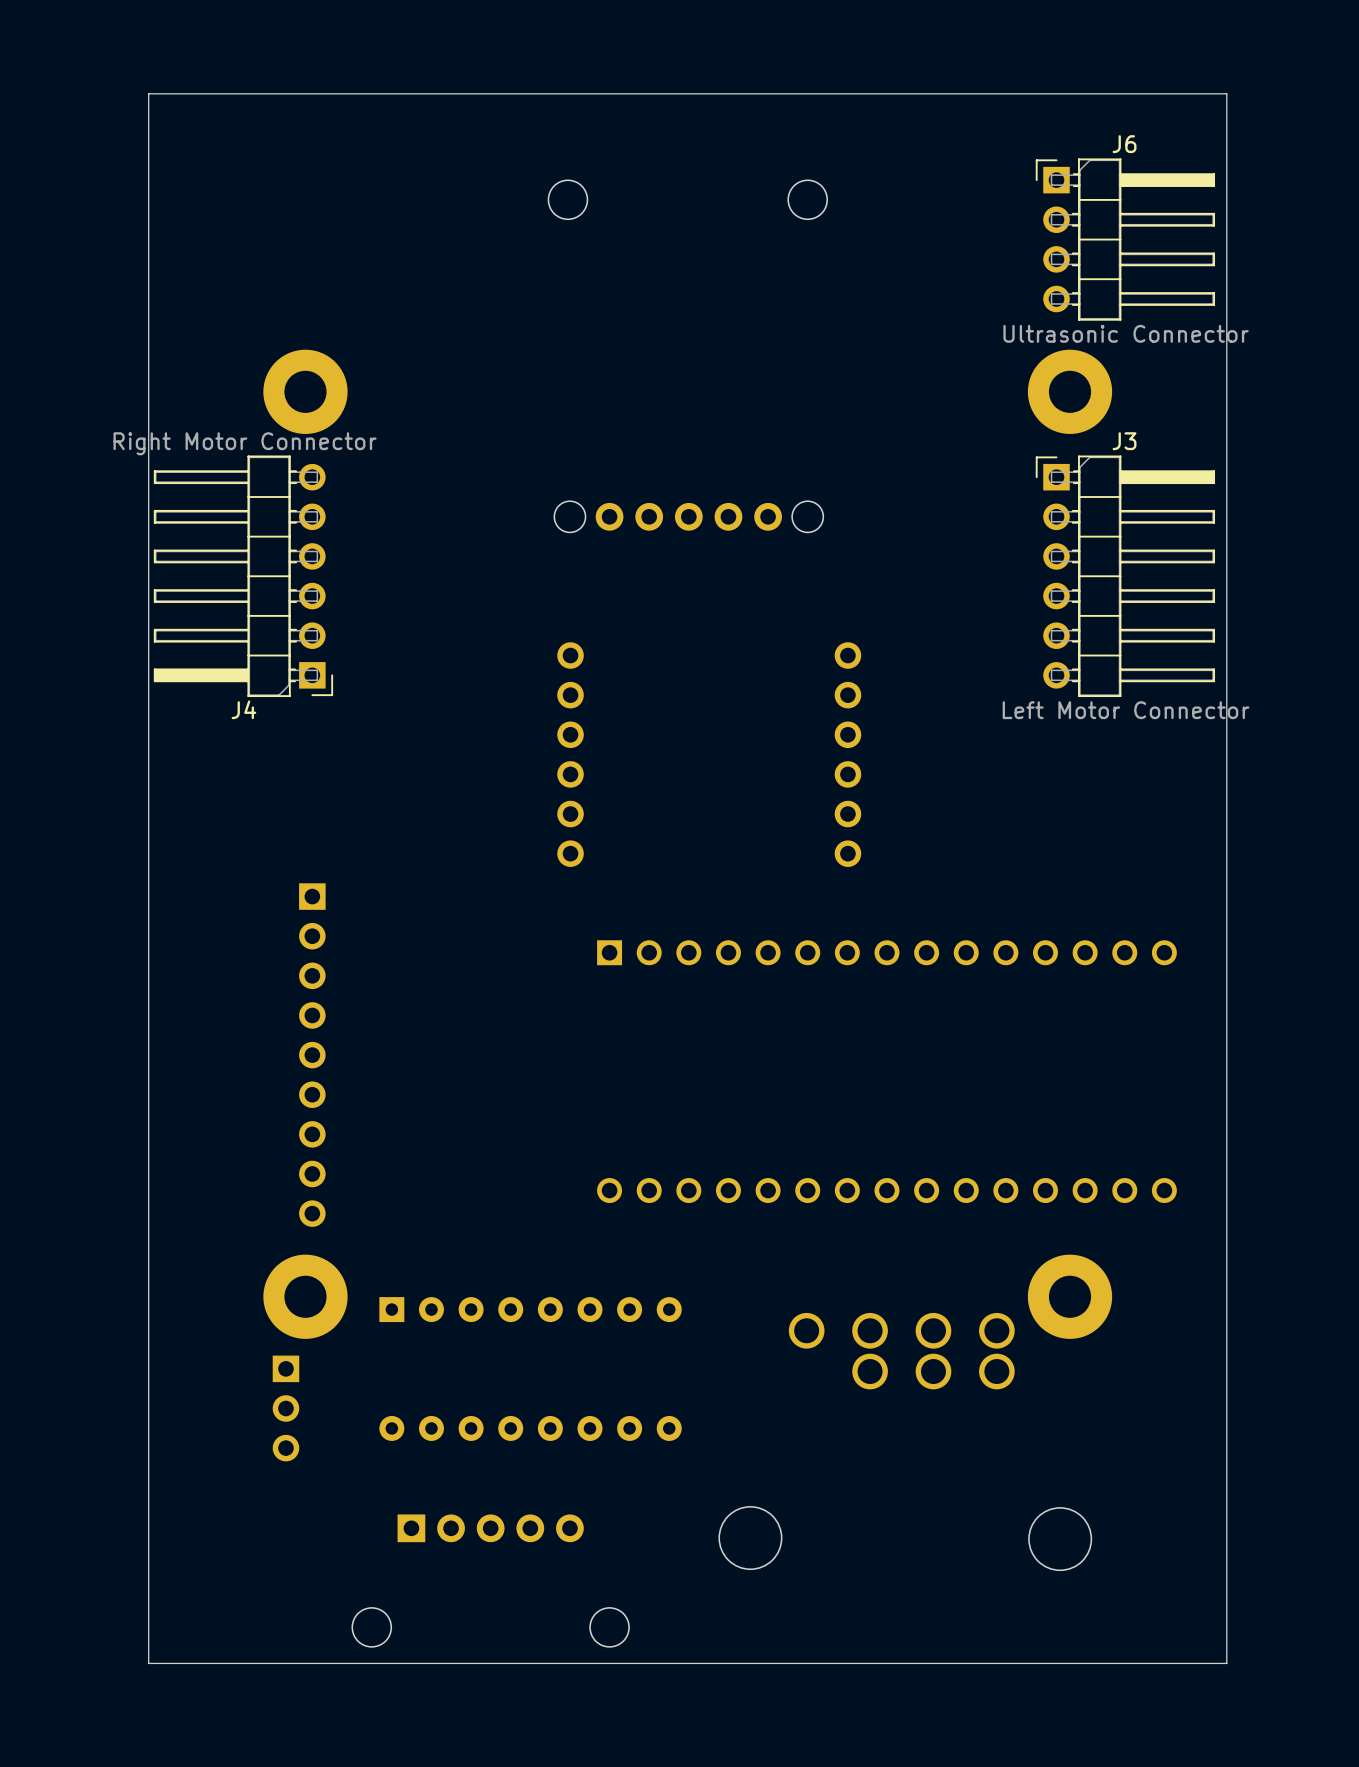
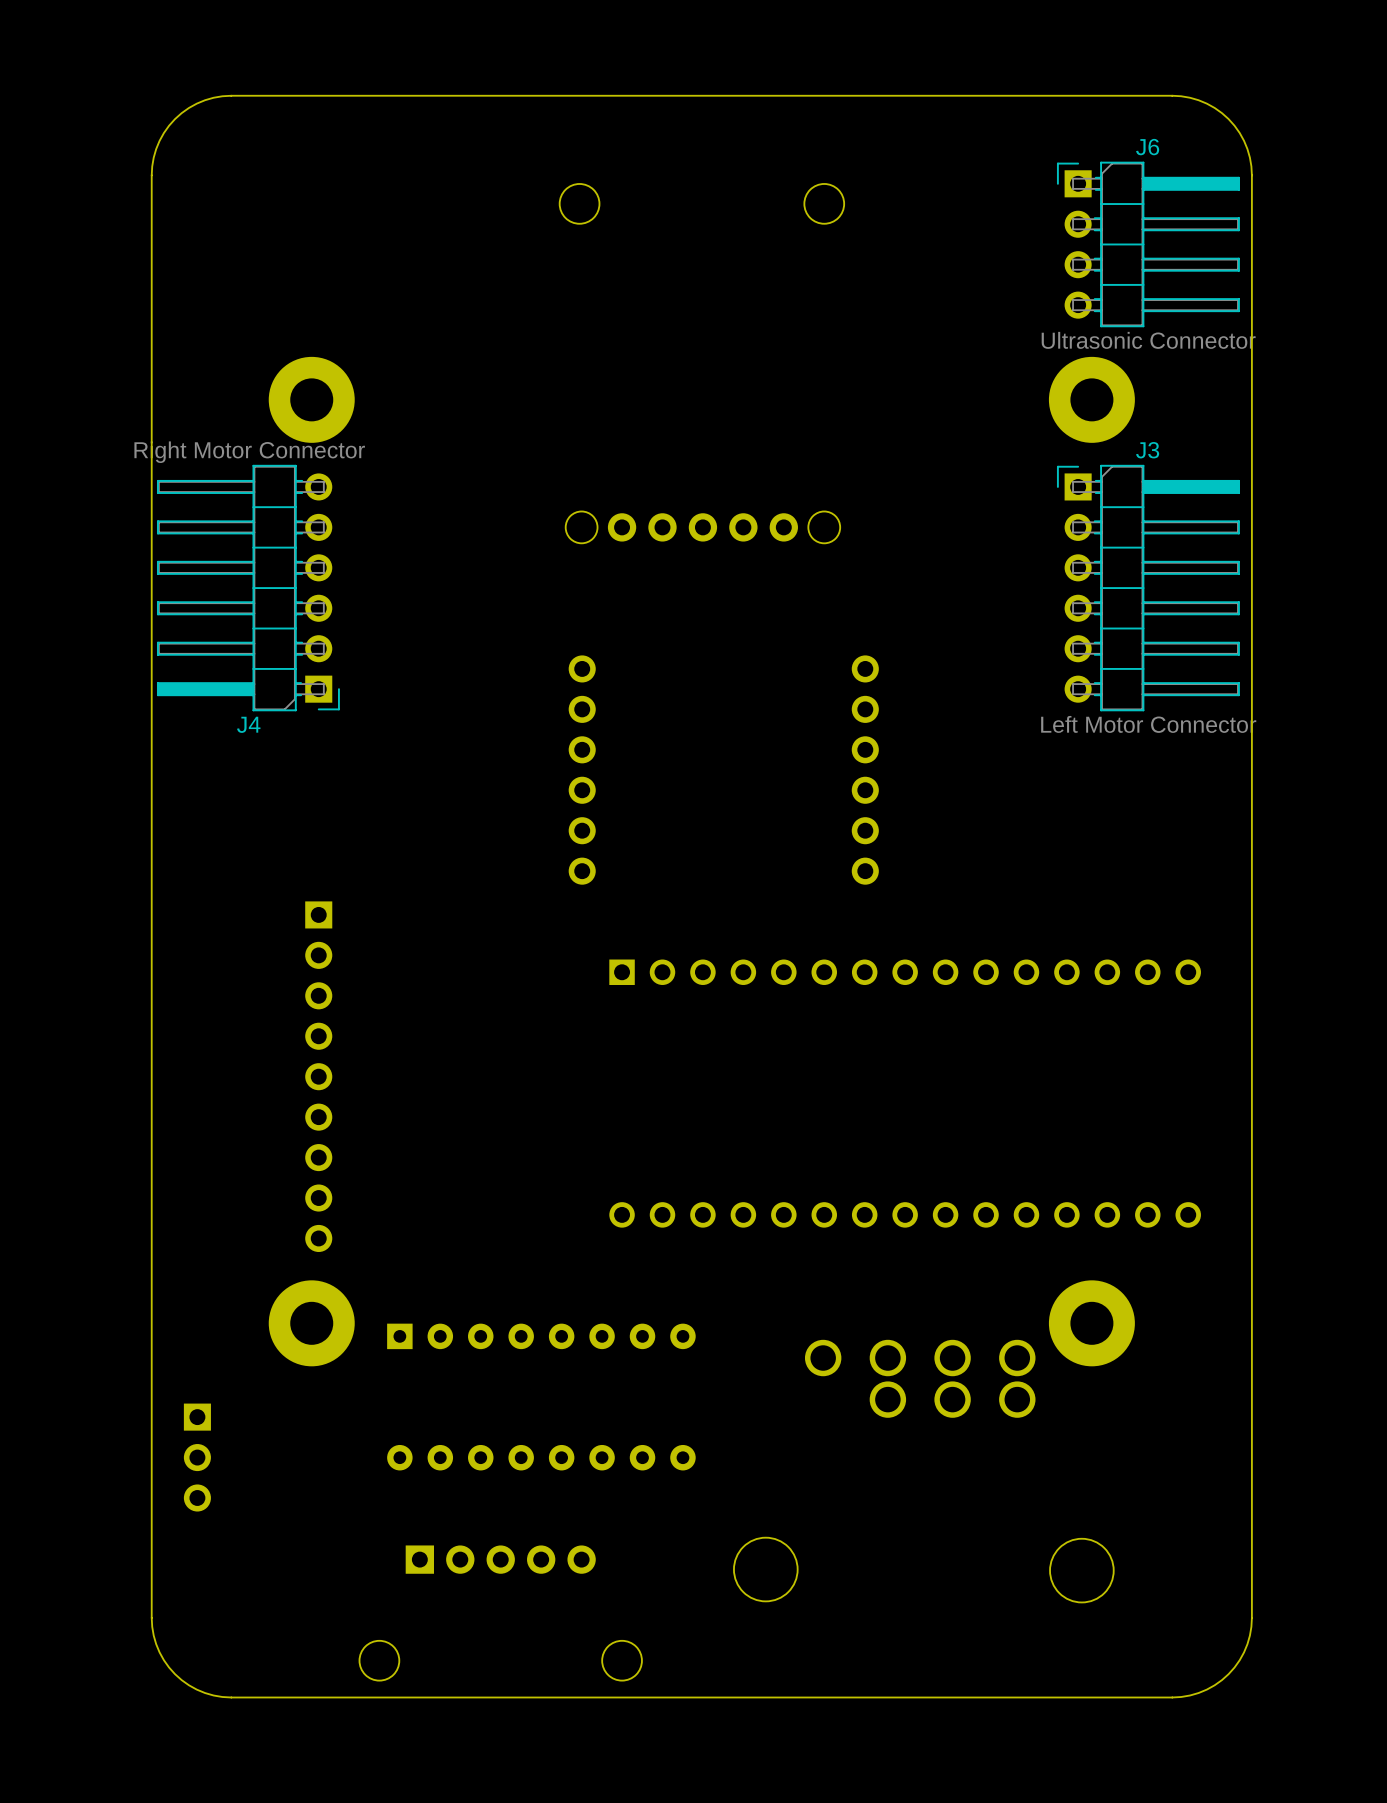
board edge: (226, 93) (148, 93) (148, 171) -> (231, 95) (205, 100) (188, 107) (175, 119) (159, 140) (153, 157) (151, 175)
board edge: (1148, 93) (1226, 93) (1226, 171) -> (1172, 95) (1190, 97) (1206, 103) (1228, 119) (1239, 133) (1247, 149) (1251, 175)
part position: (285, 1408) -> (197, 1457)
board edge: (148, 1585) (148, 1663) (226, 1663) -> (151, 1617) (156, 1644) (163, 1660) (175, 1674) (188, 1685) (205, 1693) (231, 1697)
board edge: (1226, 1585) (1226, 1663) (1148, 1663) -> (1251, 1617) (1247, 1644) (1239, 1660) (1228, 1674) (1206, 1689) (1190, 1695) (1172, 1697)

